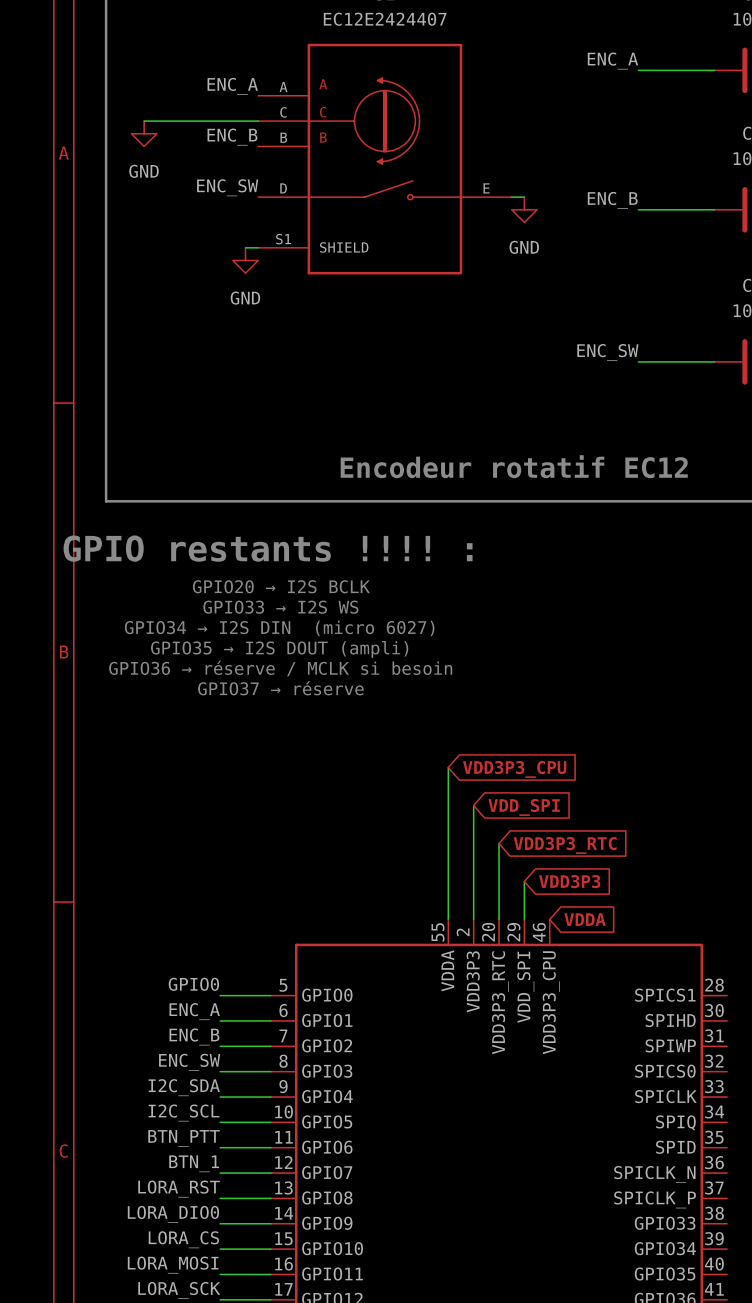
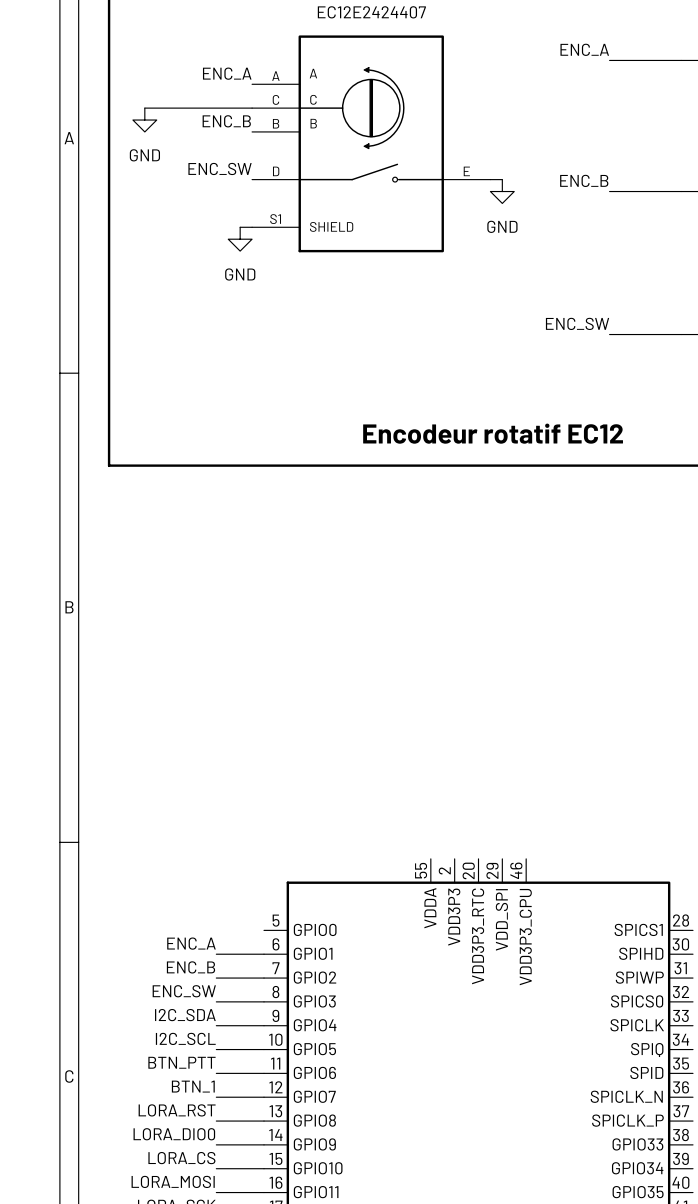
text: GPIO restants !!!! : (268, 548) -> none
text: GPIO20 → I2S BCLK (281, 586) -> none
text: GPIO33 → I2S WS (280, 607) -> none
text: GPIO34 → I2S DIN (micro 6027) (279, 628) -> none
text: GPIO35 → I2S DOUT (ampli) (279, 649) -> none
text: GPIO36 → réserve / MCLK si besoin (280, 668) -> none
text: GPIO37 → réserve (280, 688) -> none
wire: (448, 767) (448, 919) -> none
global label: VDD3P3_CPU (514, 769) -> none
wire: (473, 805) (473, 919) -> none
global label: VDD_SPI (524, 807) -> none
wire: (499, 843) (499, 919) -> none
global label: VDD3P3_RTC (565, 845) -> none
wire: (524, 881) (524, 919) -> none
global label: VDD3P3 (569, 881) -> none
global label: VDDA (585, 919) -> none
label: GPIO0 (193, 984) -> none
wire: (220, 995) (270, 995) -> none

